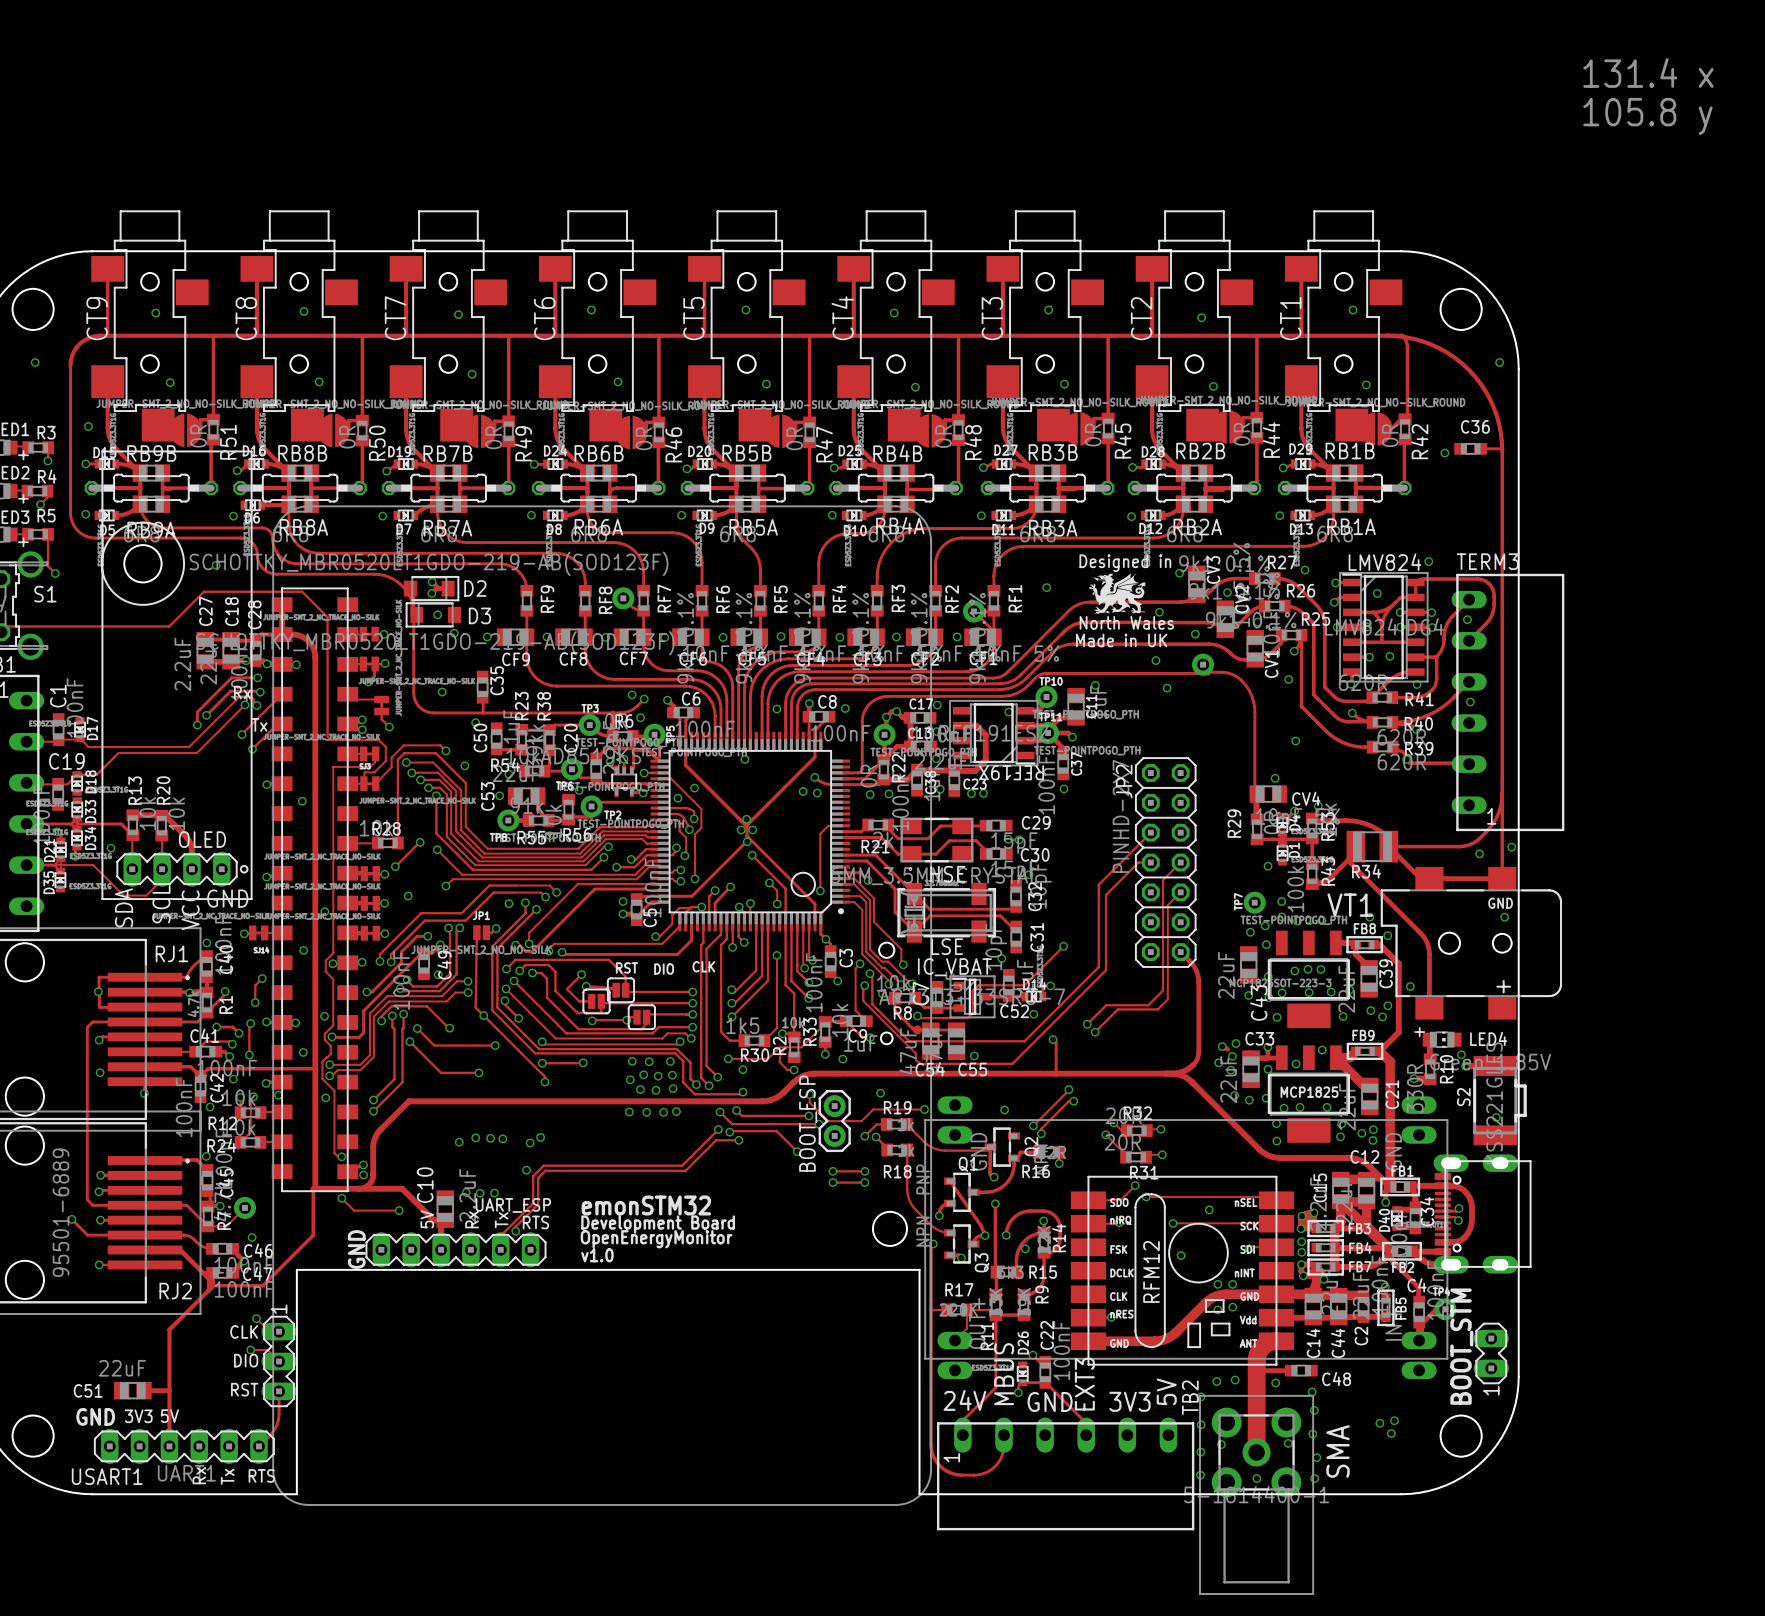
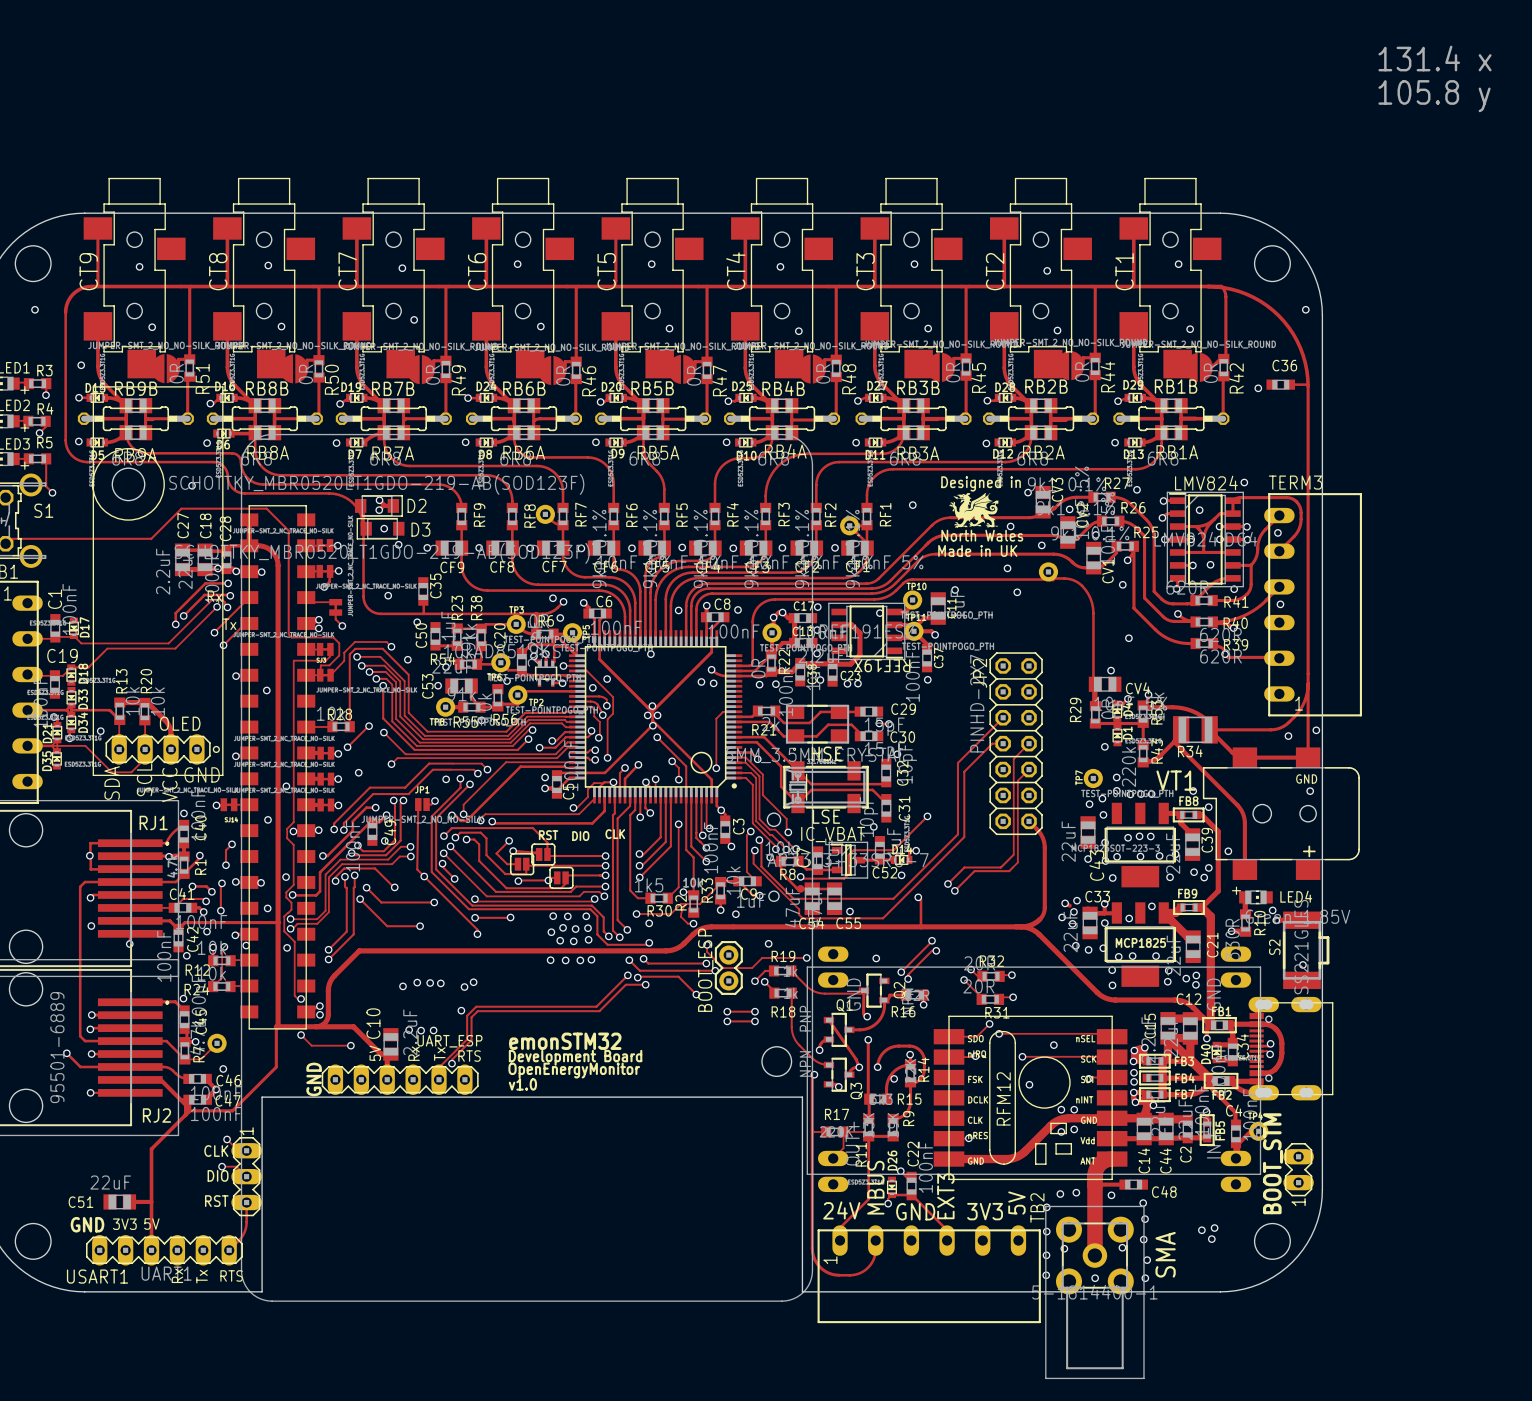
R43 value: 100k (1295, 889) -> 220k (1128, 766)

